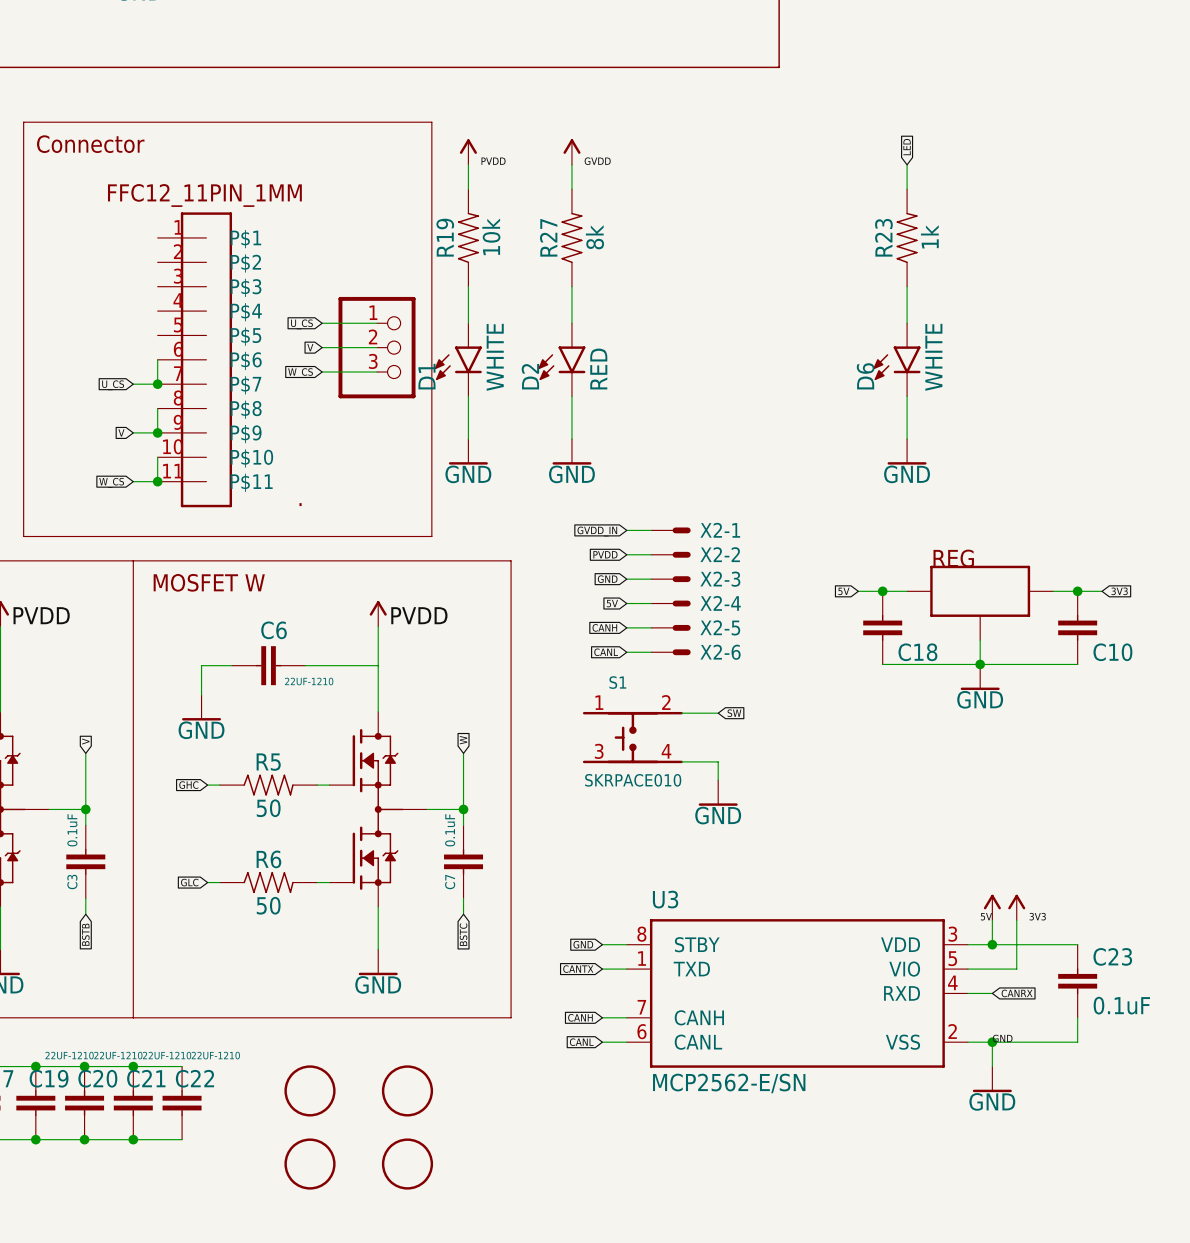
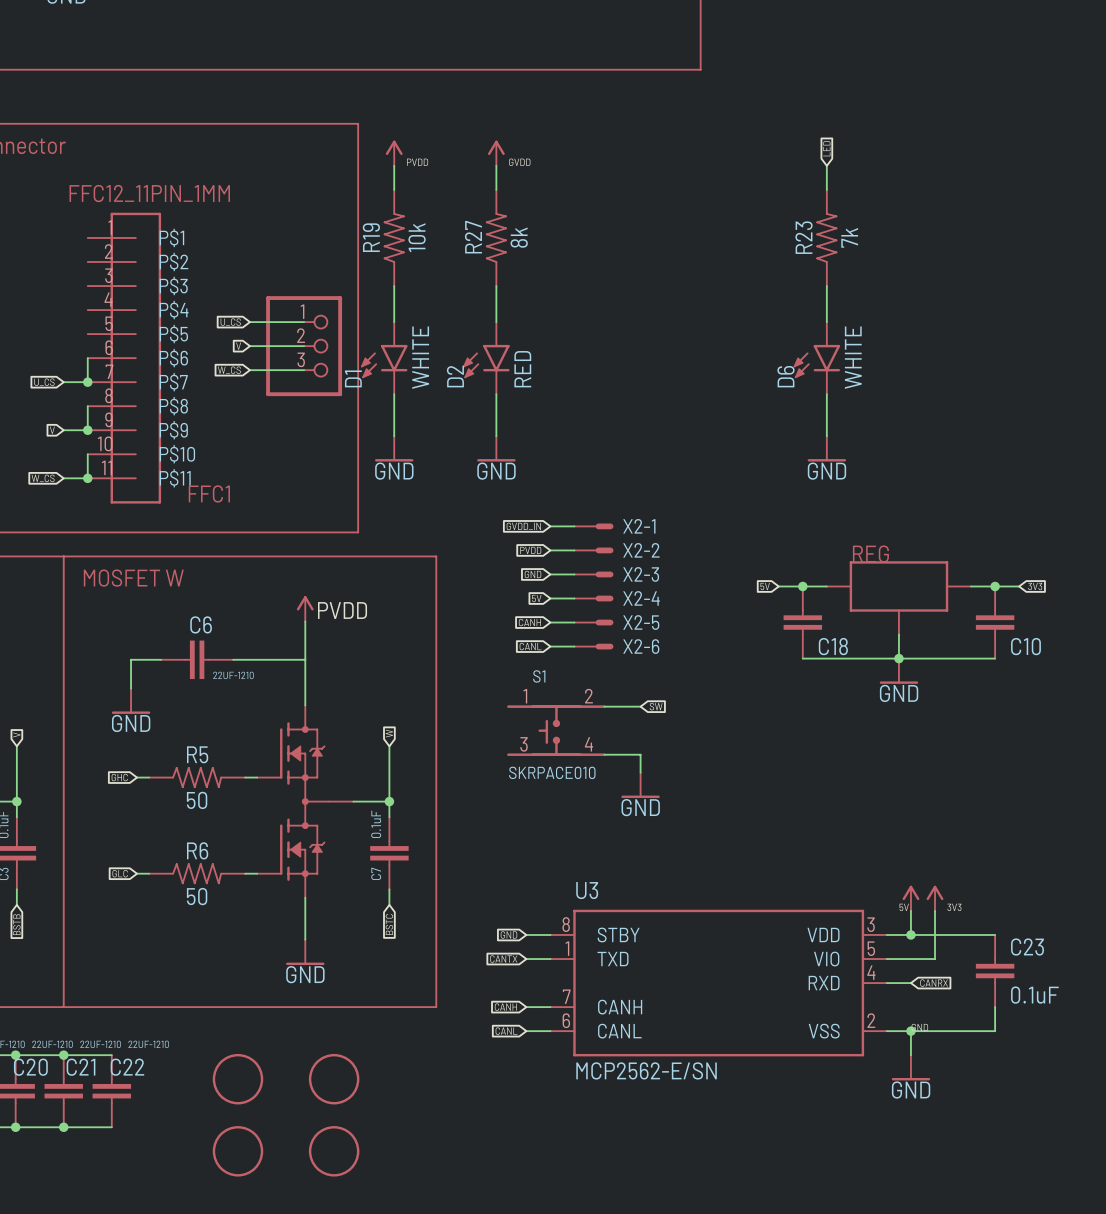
R23 value: 1k (929, 236) -> 7k (849, 237)
FFC1 name: . (300, 504) -> FFC1 (209, 493)

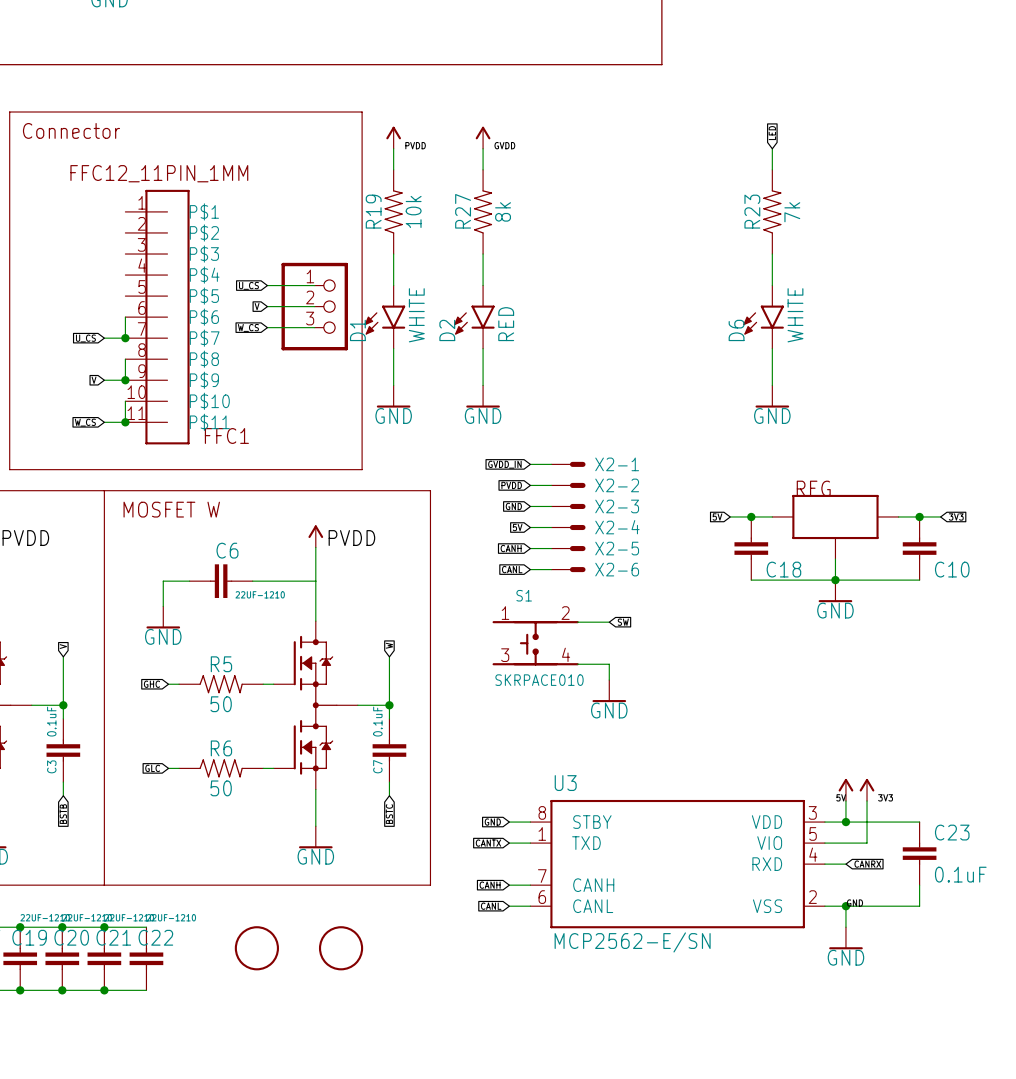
part: (237, 1151) -> none
part: (334, 1151) -> none

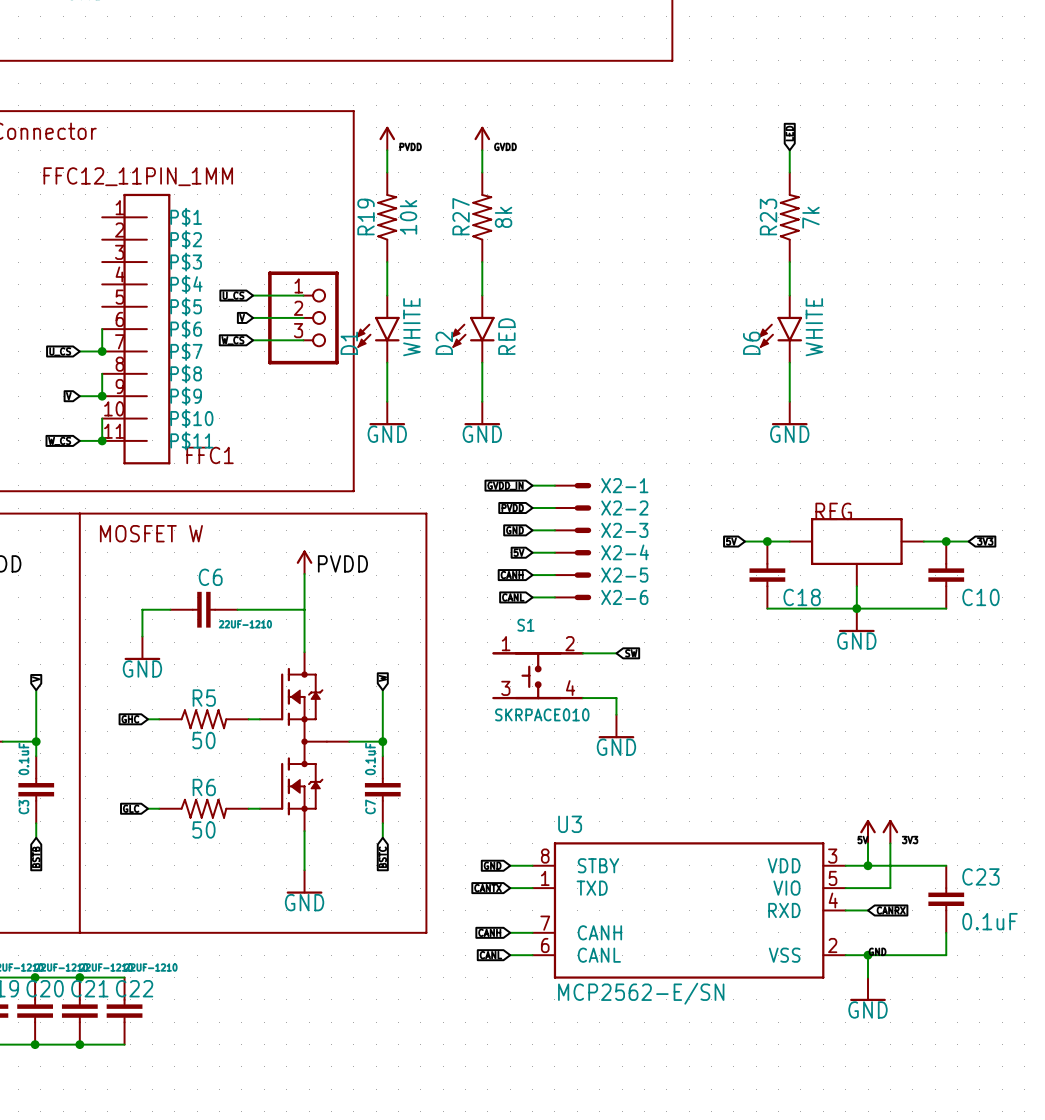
part: (256, 948) -> none
part: (341, 948) -> none

